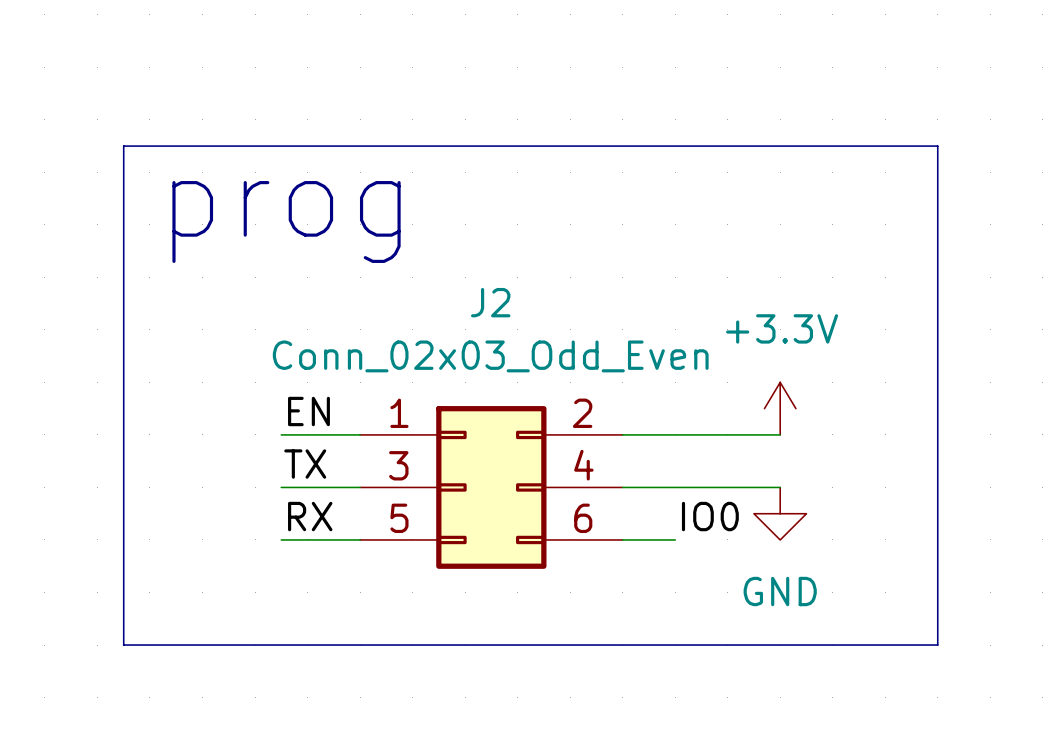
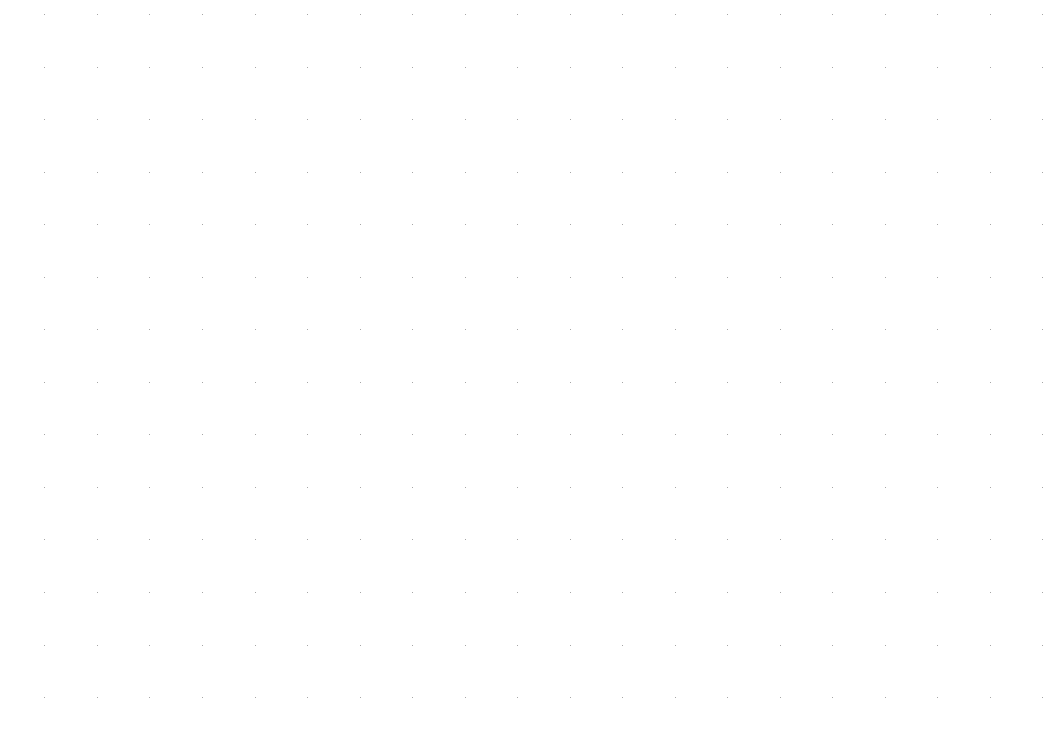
line: (123, 146) (937, 146) (937, 645) (123, 645) (123, 146) -> none
text: prog (286, 222) -> none
power symbol: +3.3V (780, 408) -> none
label: EN (308, 411) -> none
wire: (281, 434) (360, 434) -> none
wire: (622, 434) (780, 434) -> none
label: TX (305, 464) -> none
wire: (281, 487) (360, 487) -> none
J2: Conn_02x03_Odd_Even (491, 487) -> none
wire: (622, 487) (780, 487) -> none
power symbol: GND (780, 513) -> none
label: RX (310, 516) -> none
label: IO0 (710, 516) -> none
wire: (281, 539) (360, 539) -> none
wire: (622, 539) (675, 539) -> none

